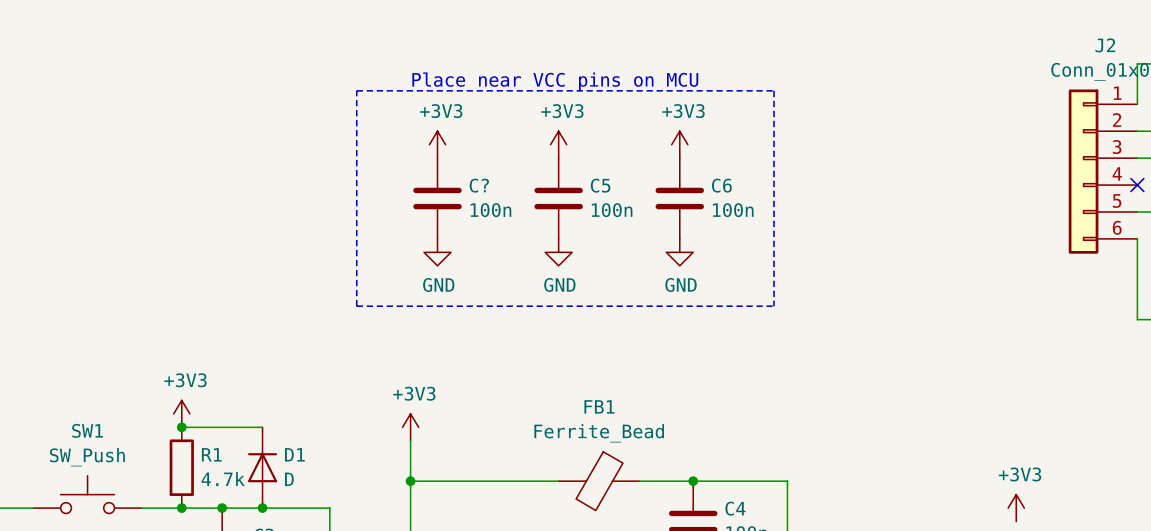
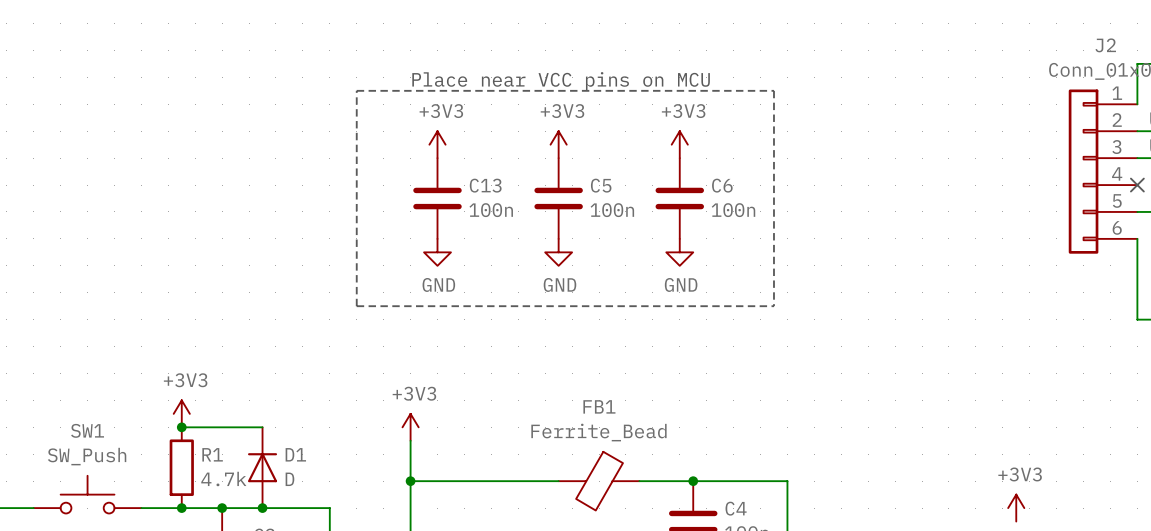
C? name: C? (479, 185) -> C13 (485, 185)

